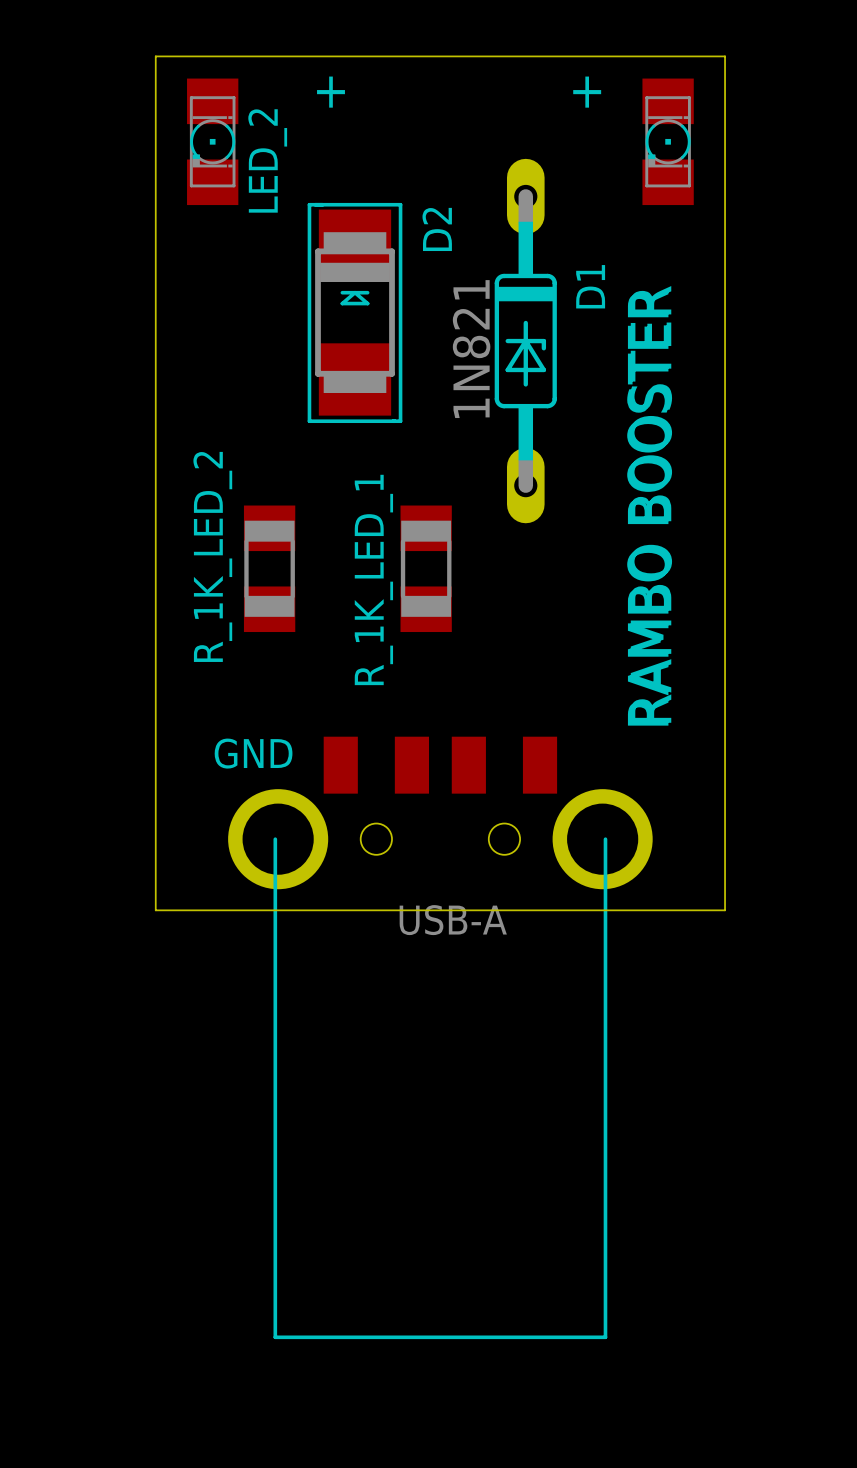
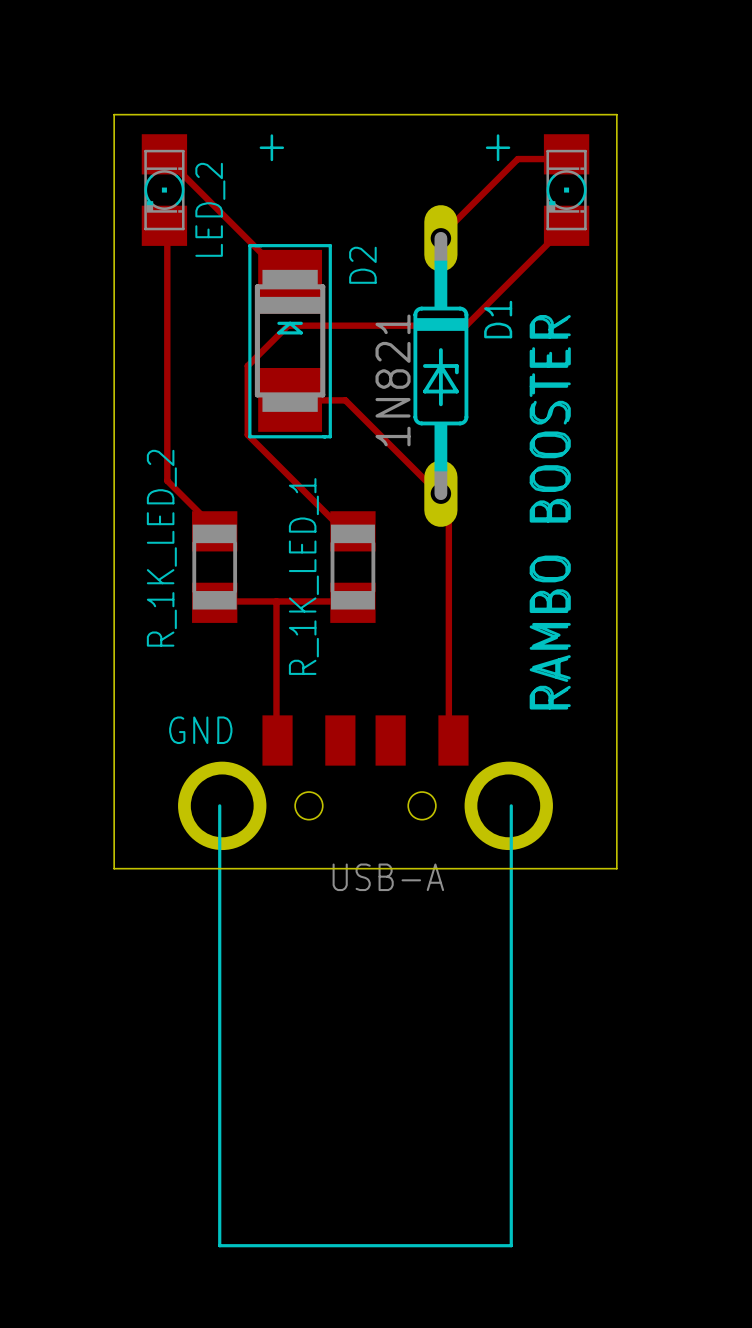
track: none -> (164, 154) (290, 281)
track: none -> (566, 154) (563, 159) (517, 159) (443, 233) (440, 238)
track: none -> (164, 225) (167, 228) (167, 480) (213, 526) (214, 531)
track: none -> (566, 225) (466, 325) (287, 325) (247, 365) (247, 434) (339, 526) (351, 526) (352, 531)
track: none -> (290, 399) (345, 400) (440, 493) (448, 503) (448, 739) (453, 740)
track: none -> (276, 601) (277, 740)
track: none -> (214, 602) (352, 602)

